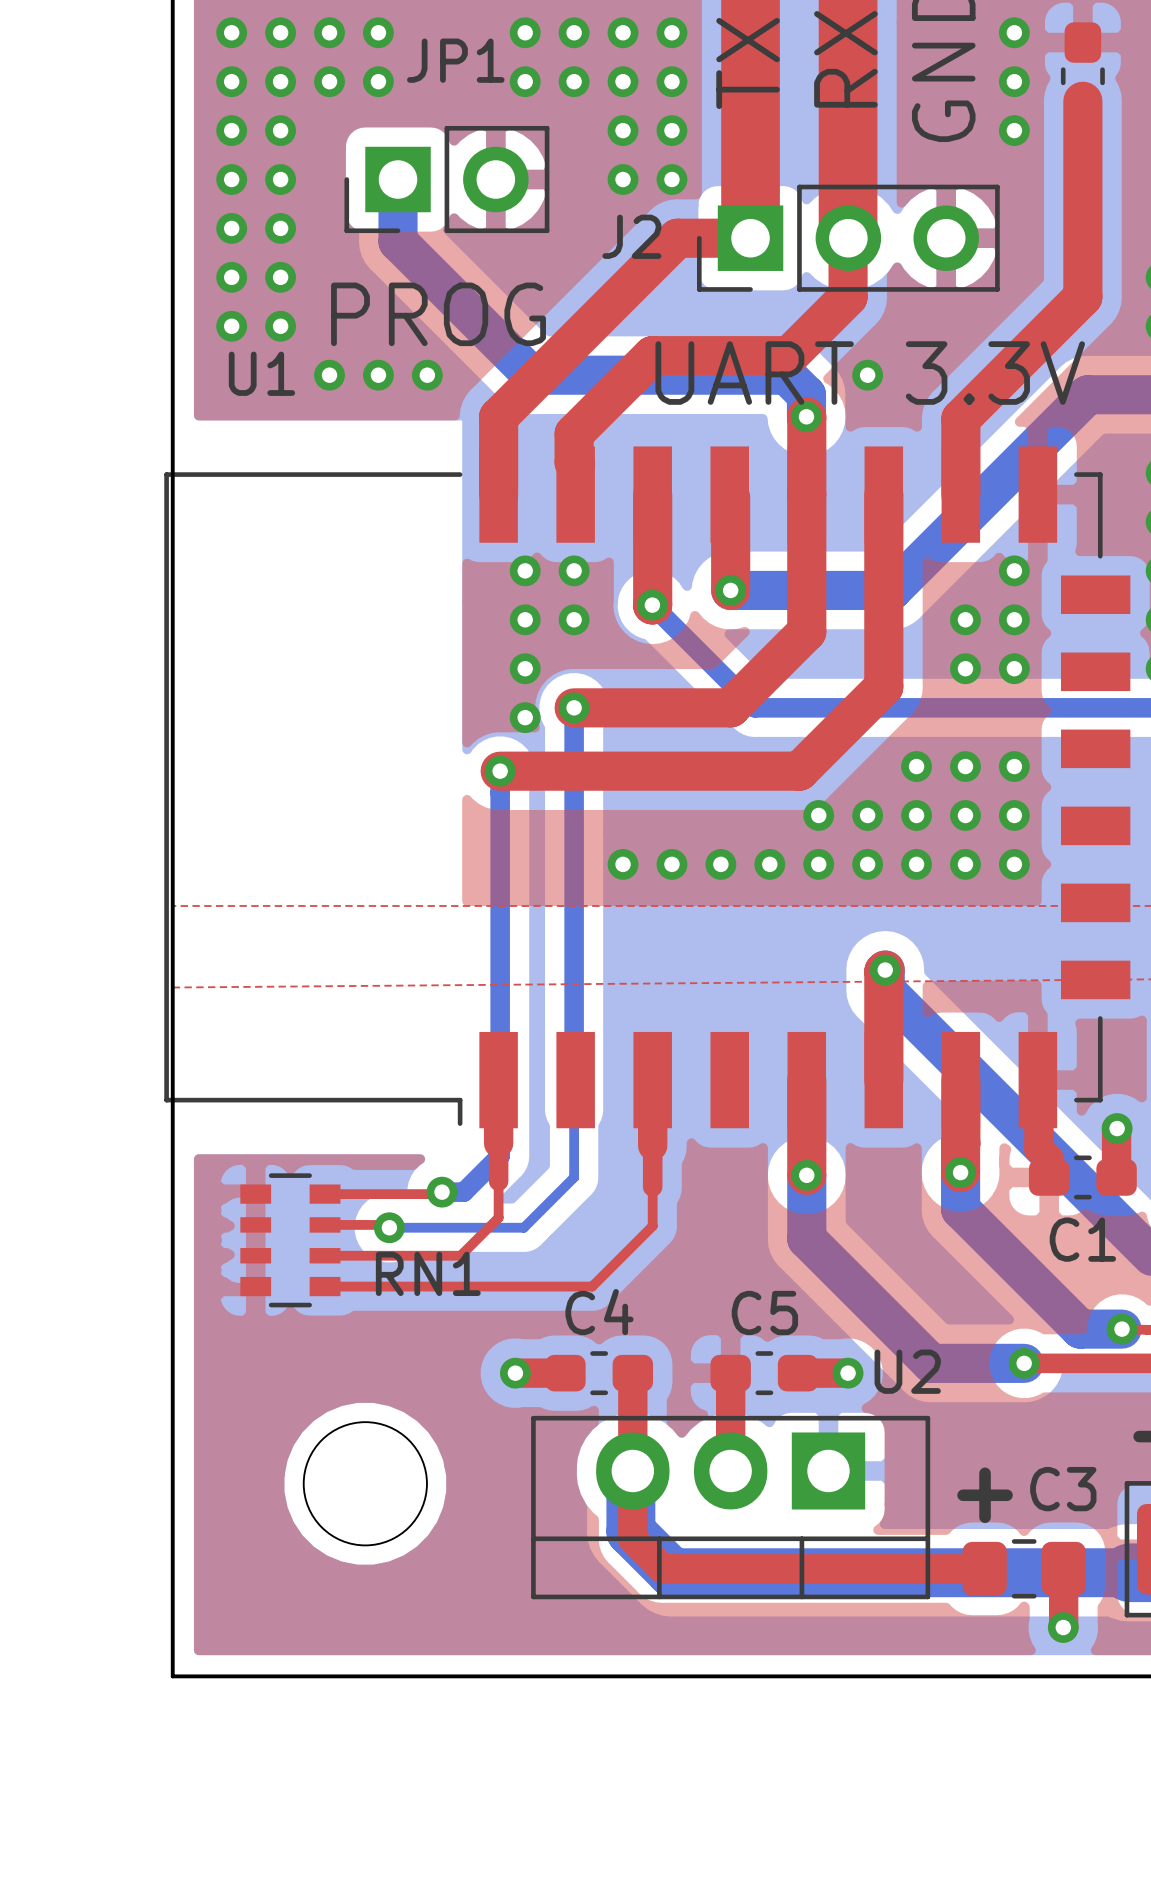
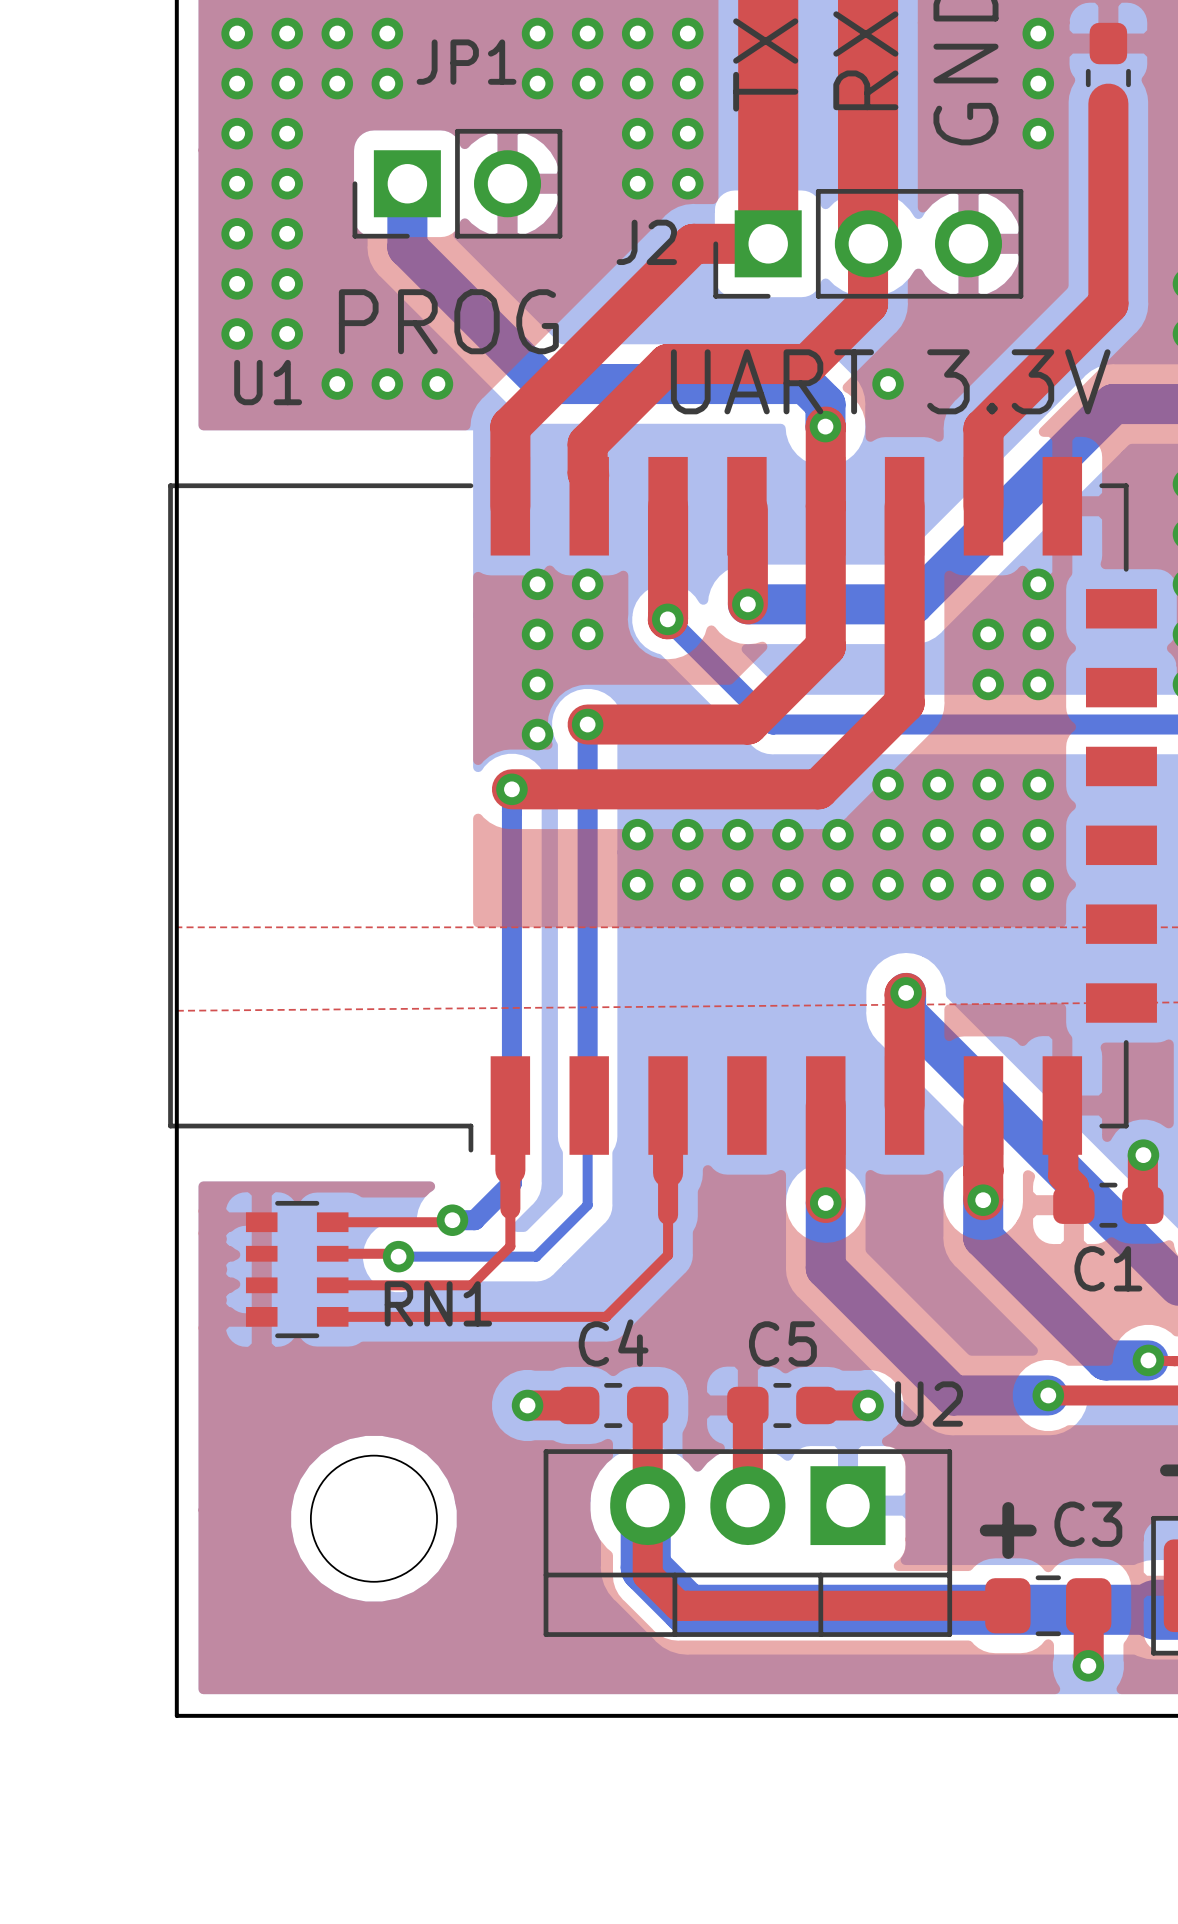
via: none -> (888, 784)
via: none -> (637, 834)
via: none -> (687, 834)
via: none -> (737, 834)
via: none -> (787, 834)

